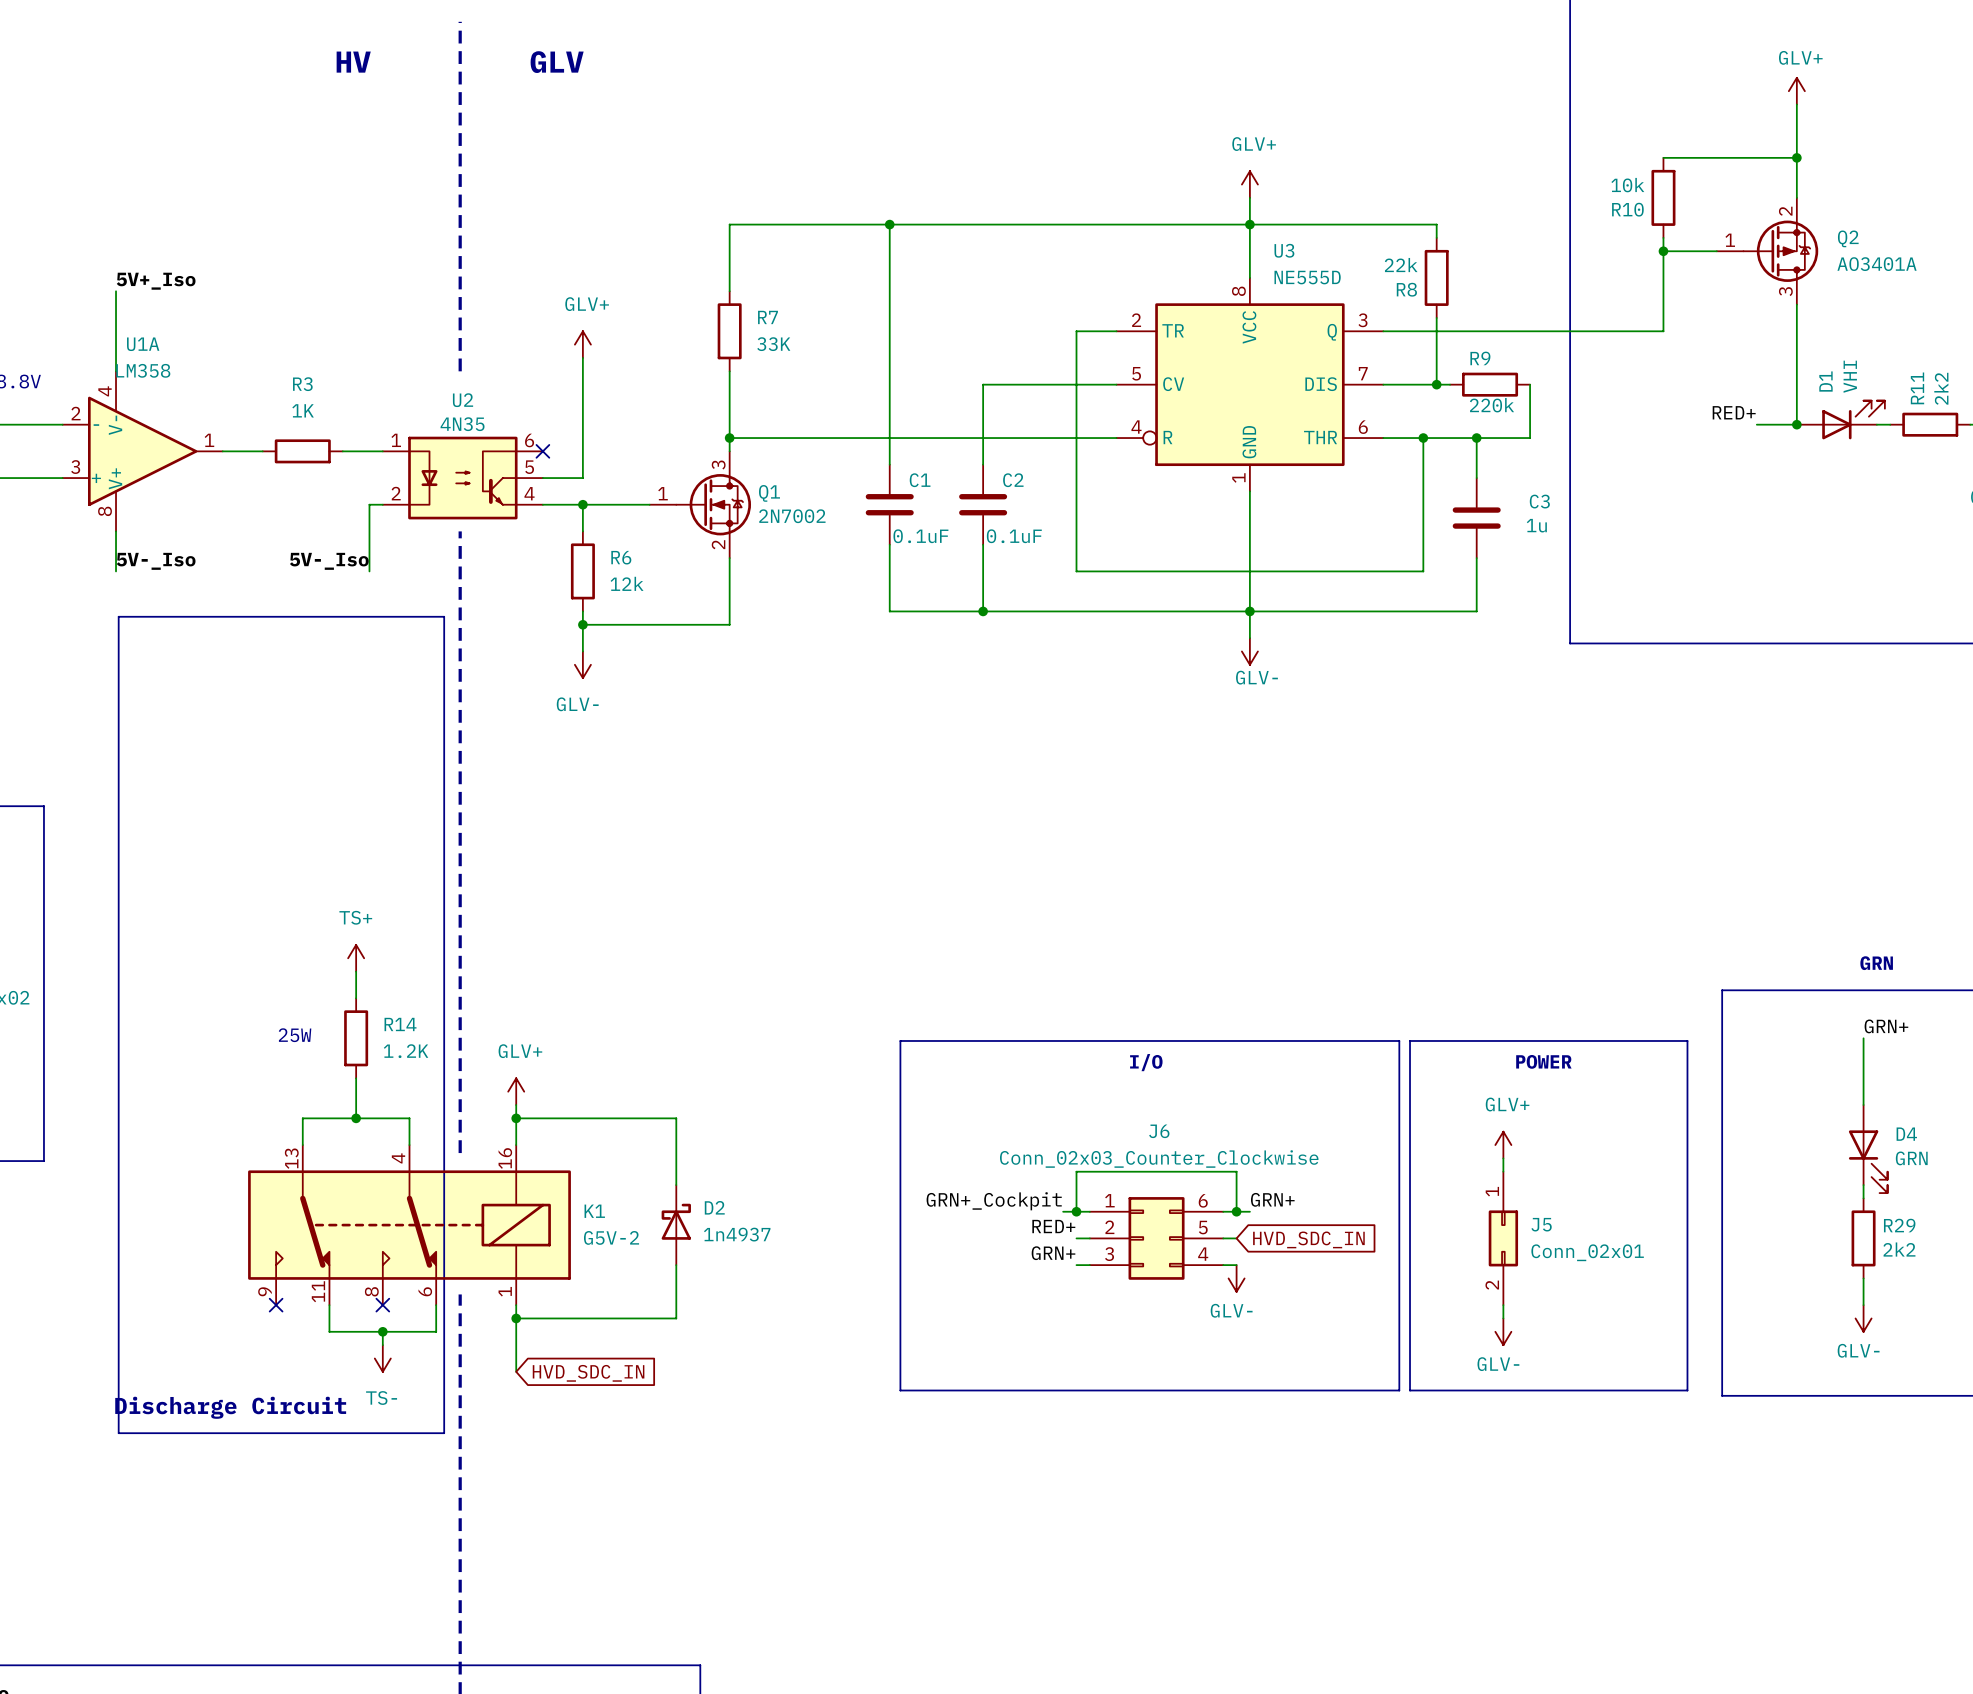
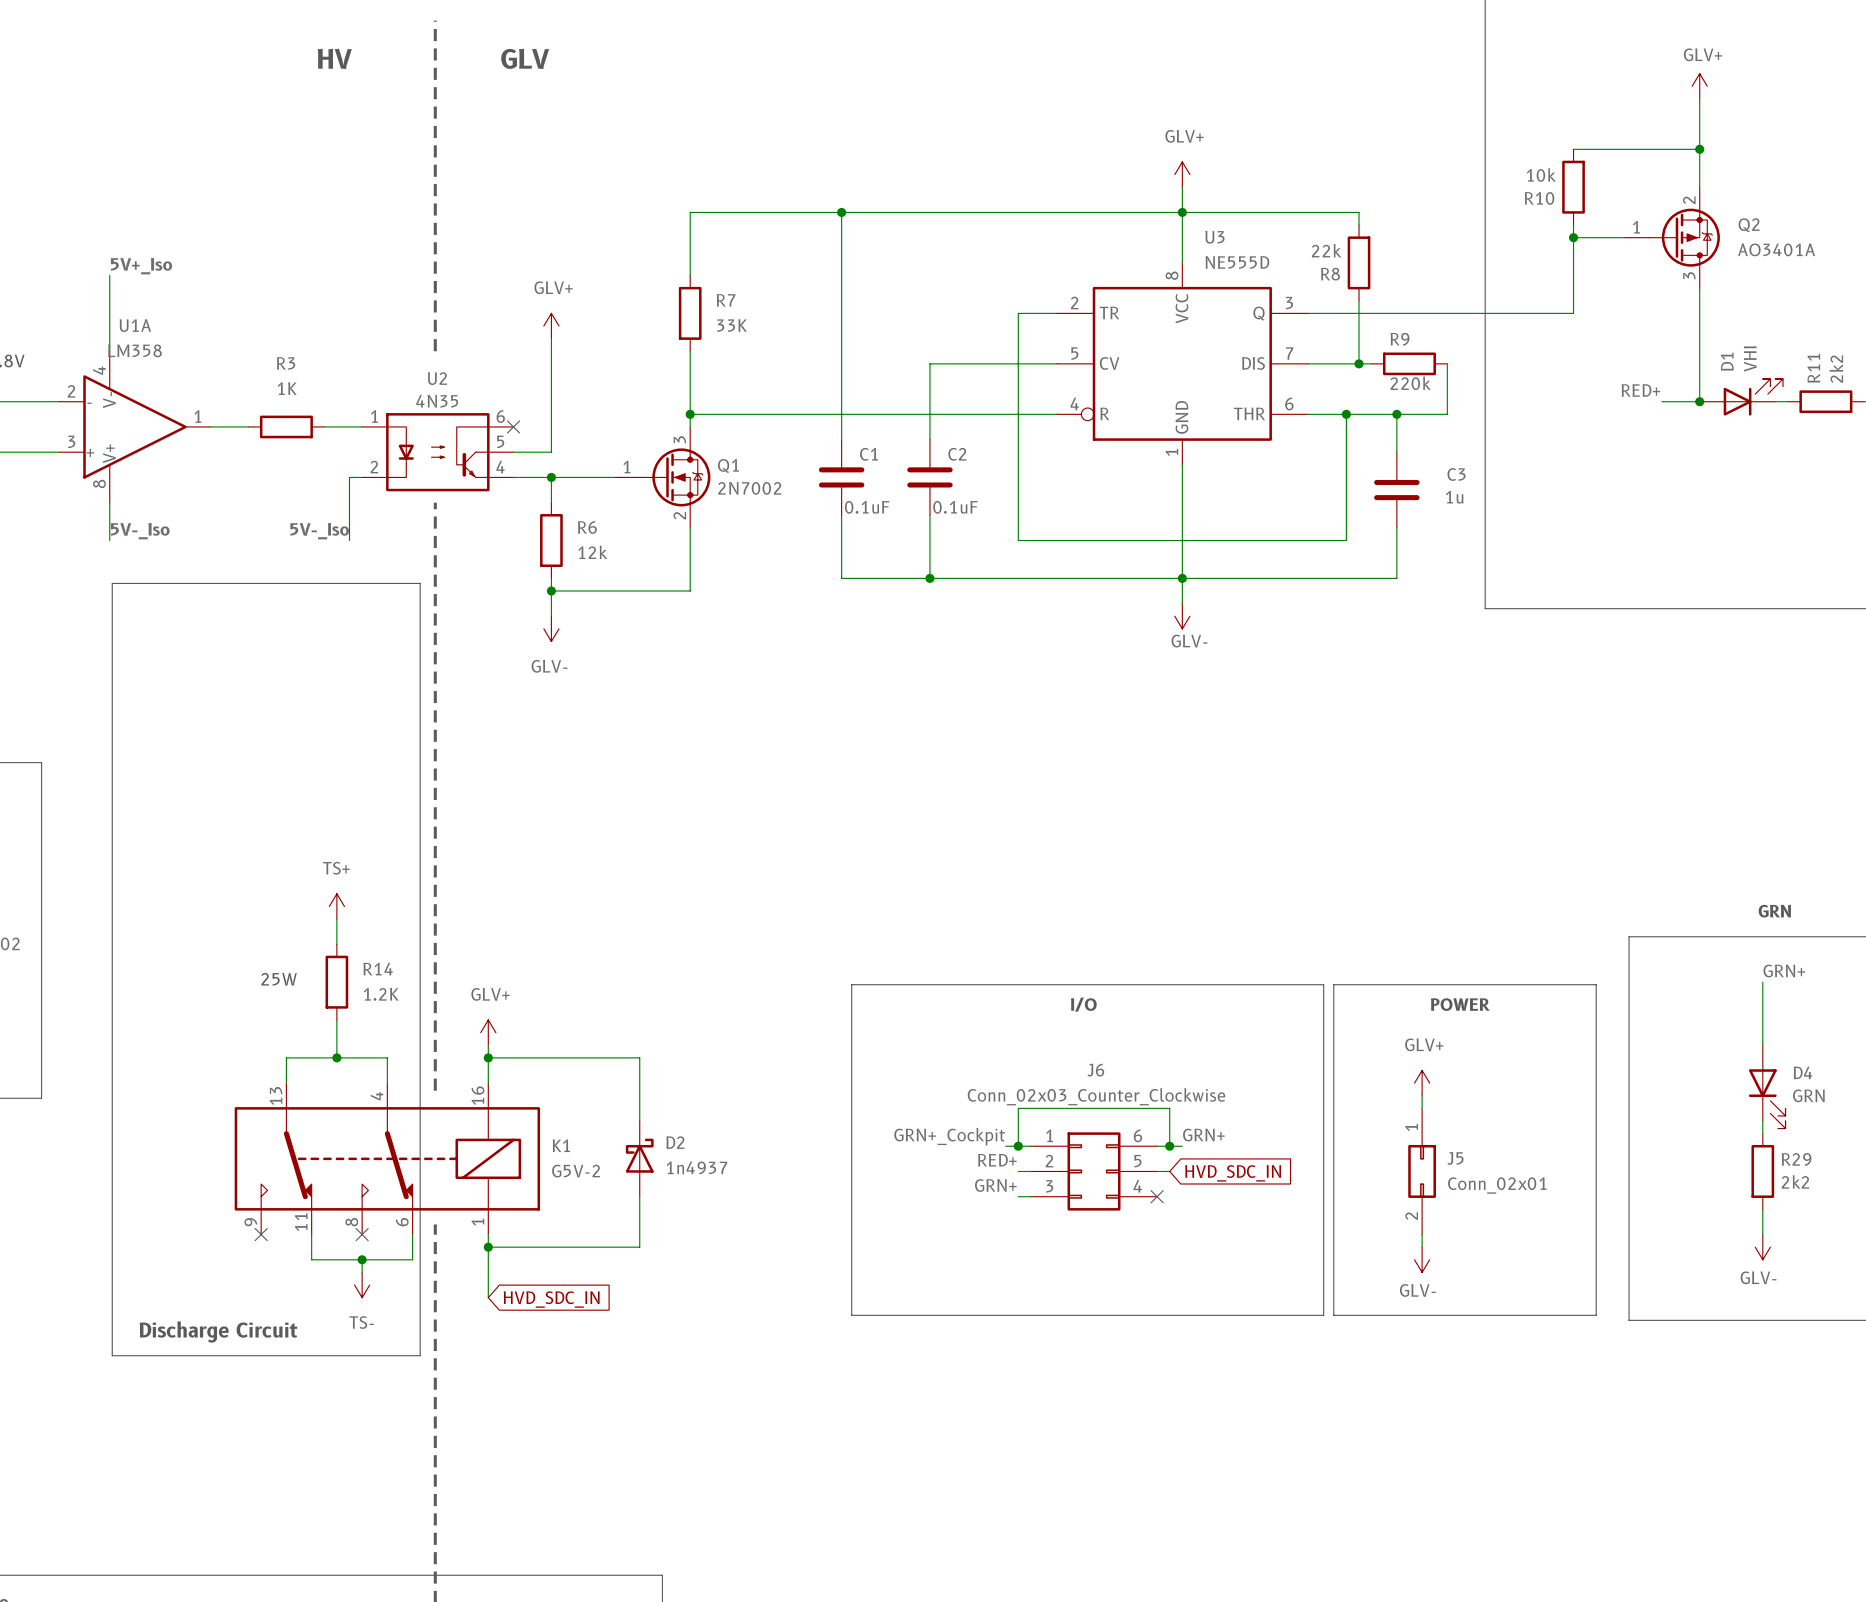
wire: (1223, 1265) (1236, 1265) -> none
no-connect mark: none -> (1157, 1196)
power symbol: GLV- (1236, 1278) -> none

